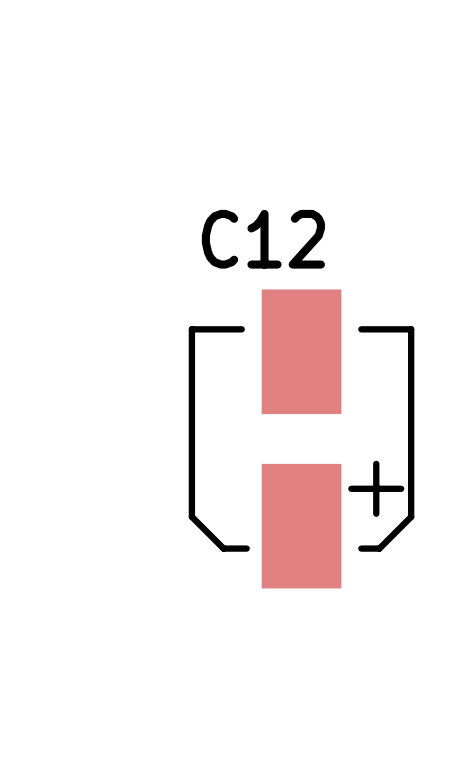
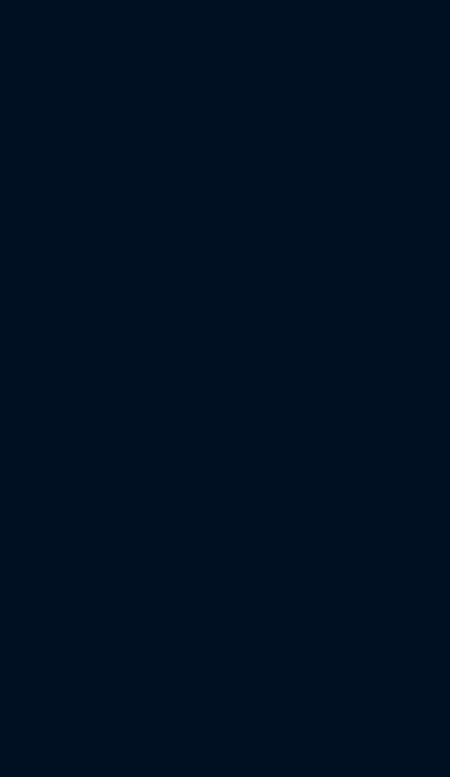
C12: (301, 438) -> none

